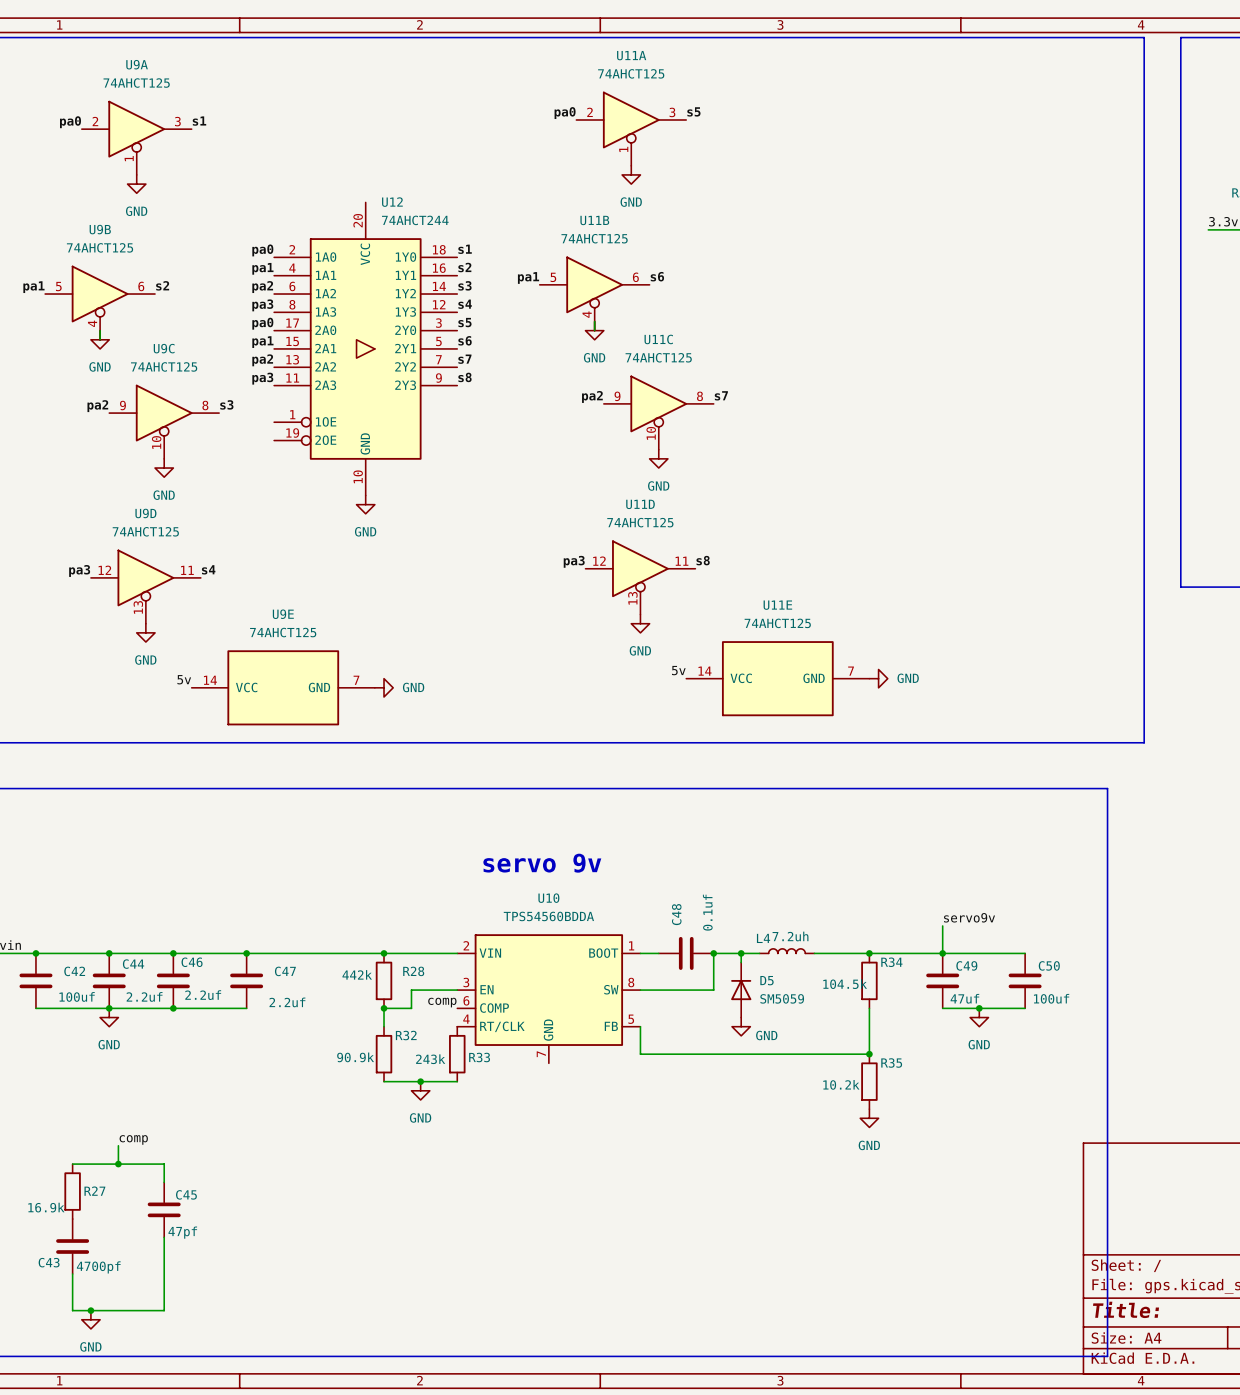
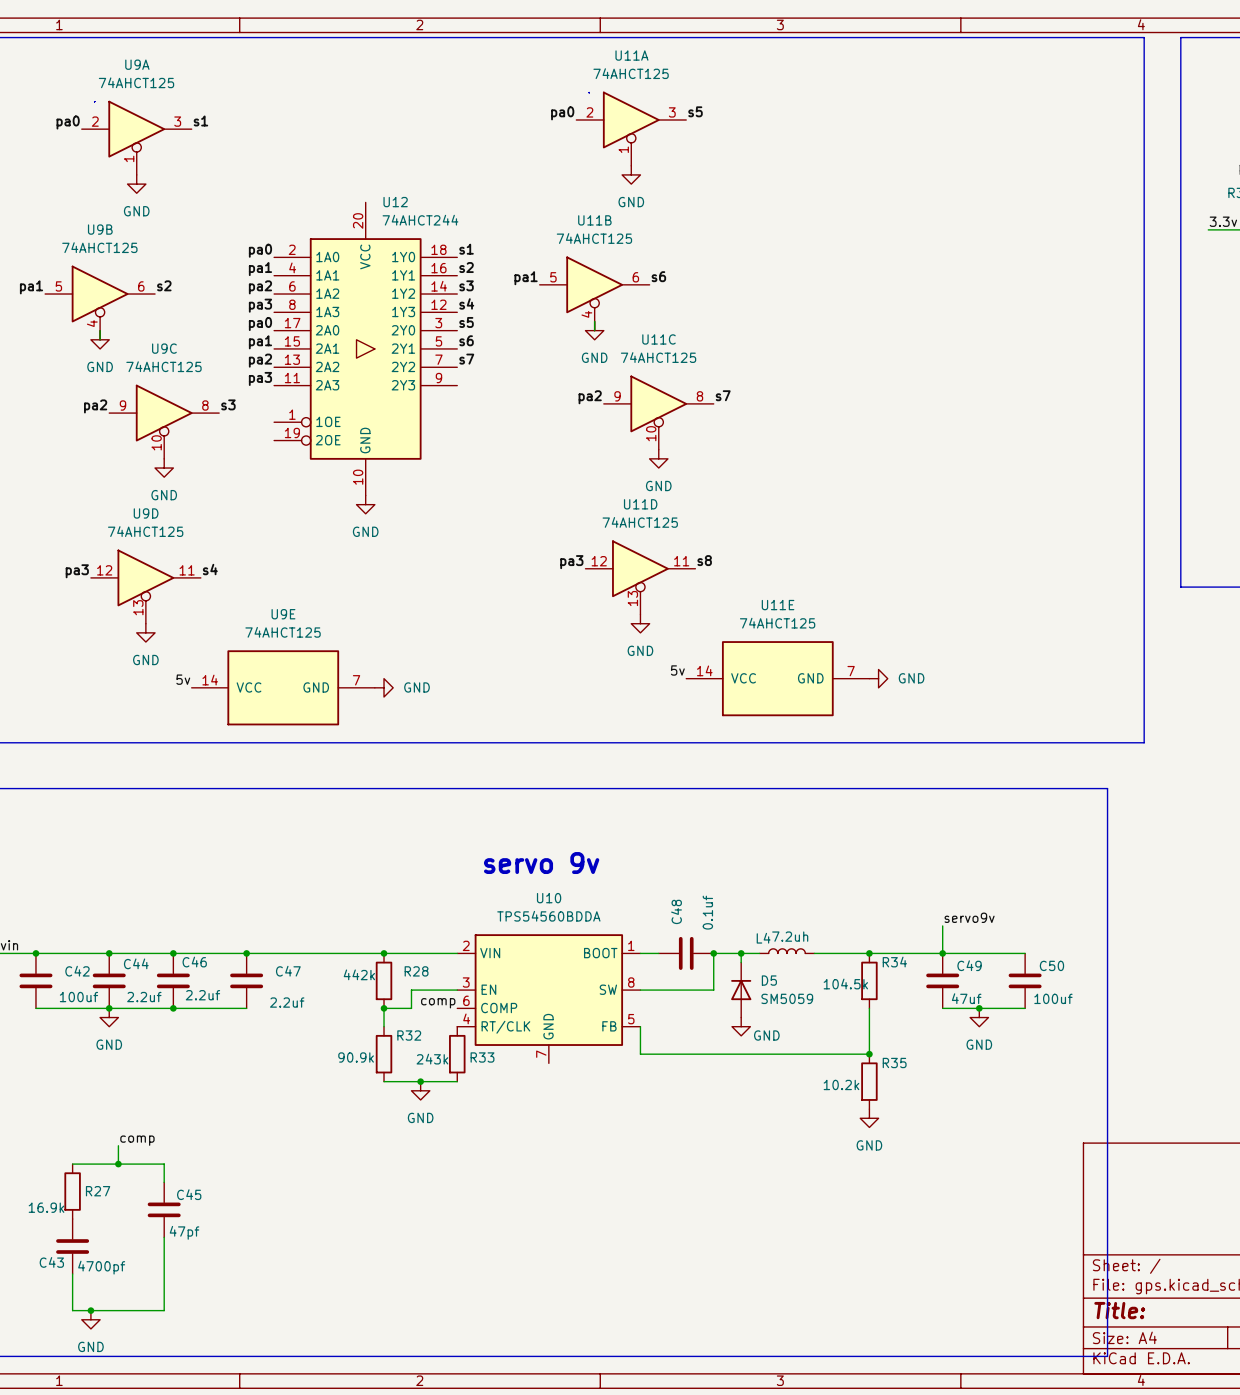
label: s8 (464, 377) -> none

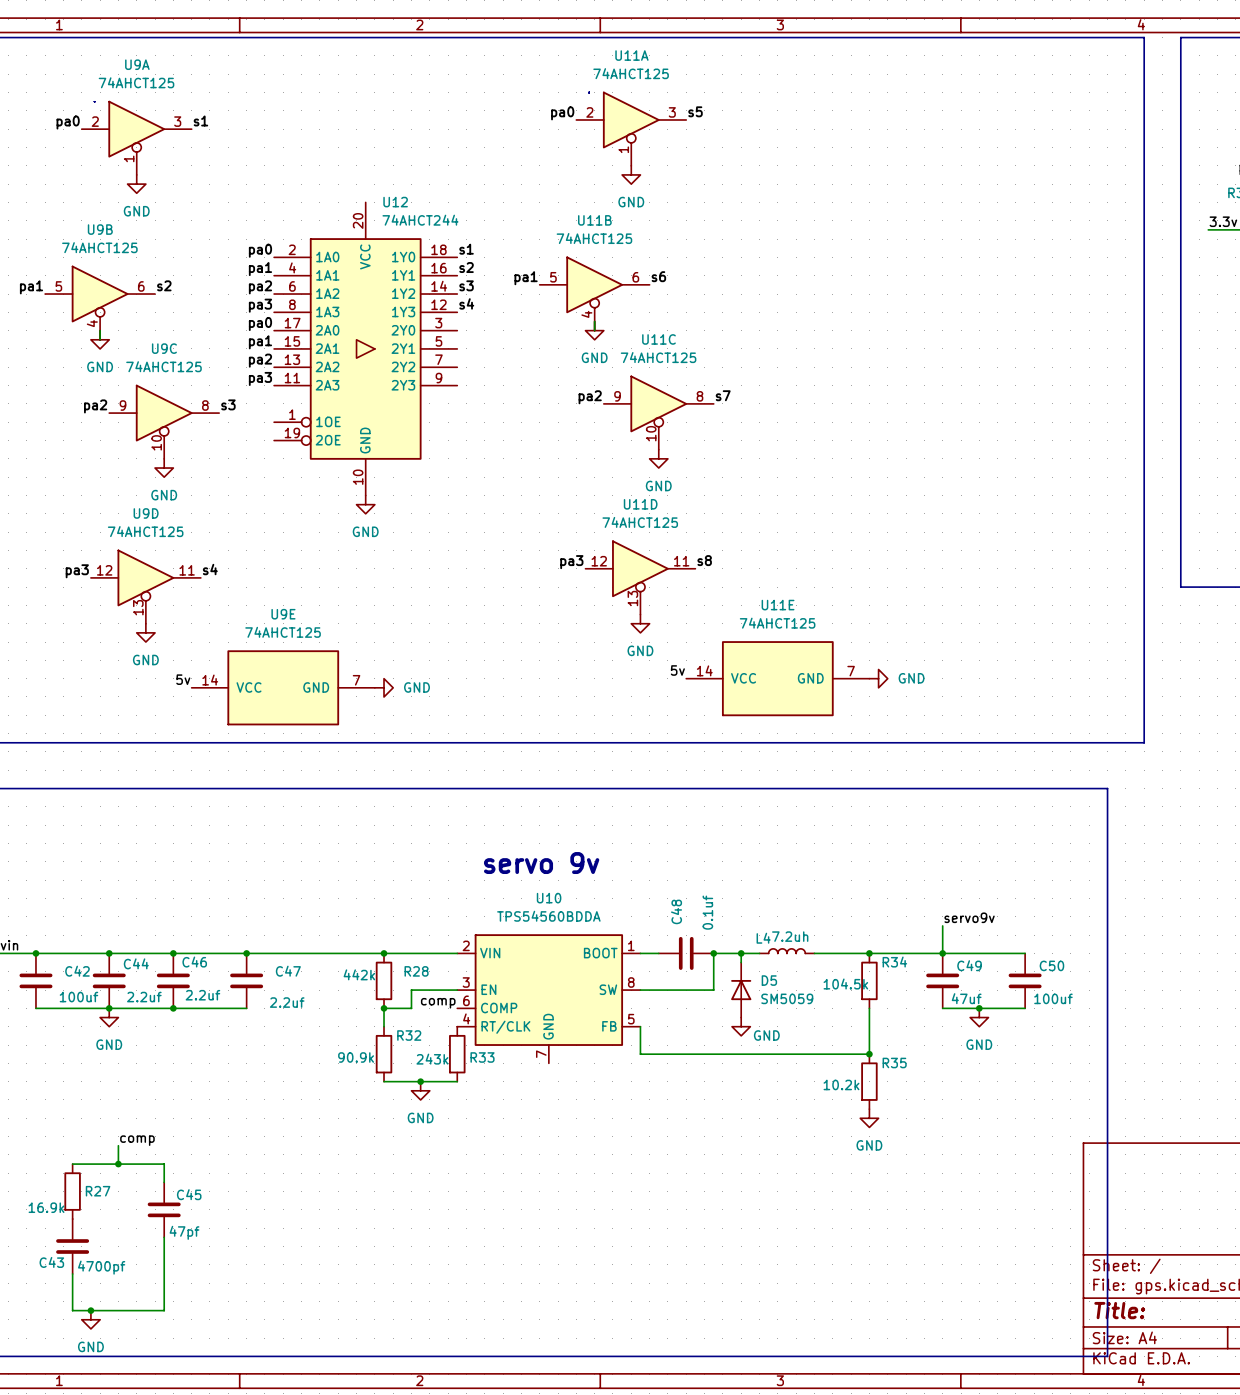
label: s5 (466, 322) -> none
label: s6 (466, 340) -> none
label: s7 (466, 359) -> none

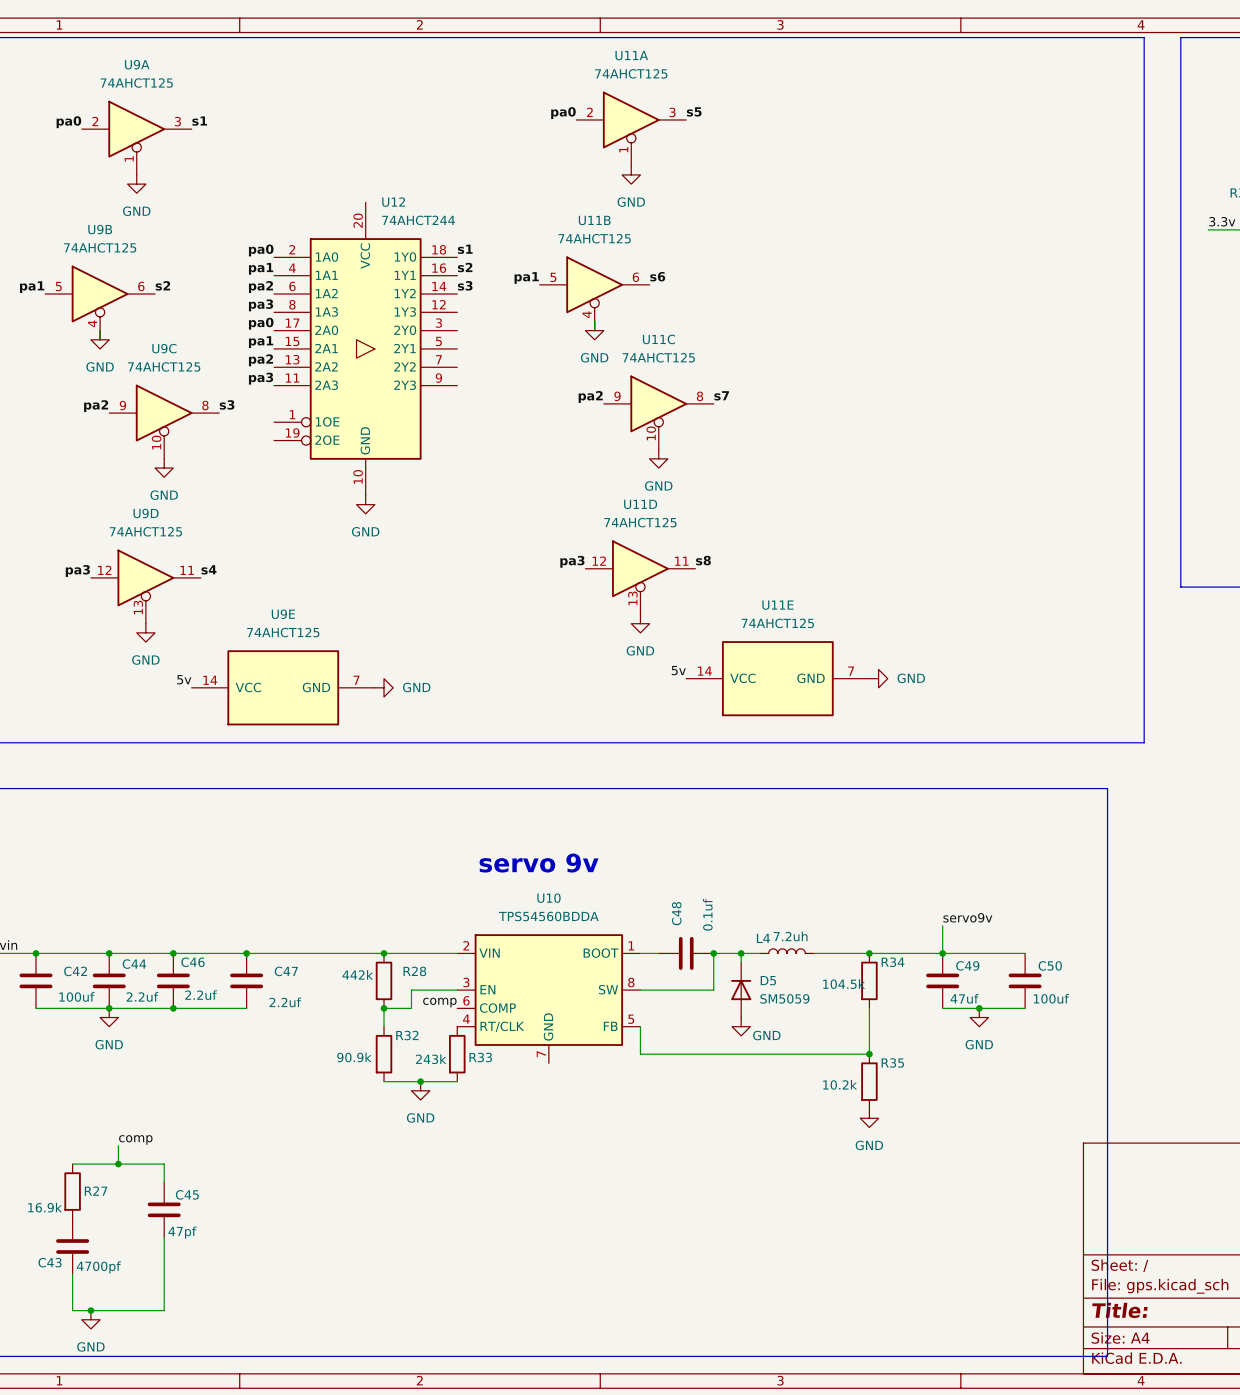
label: s4 (466, 303) -> none

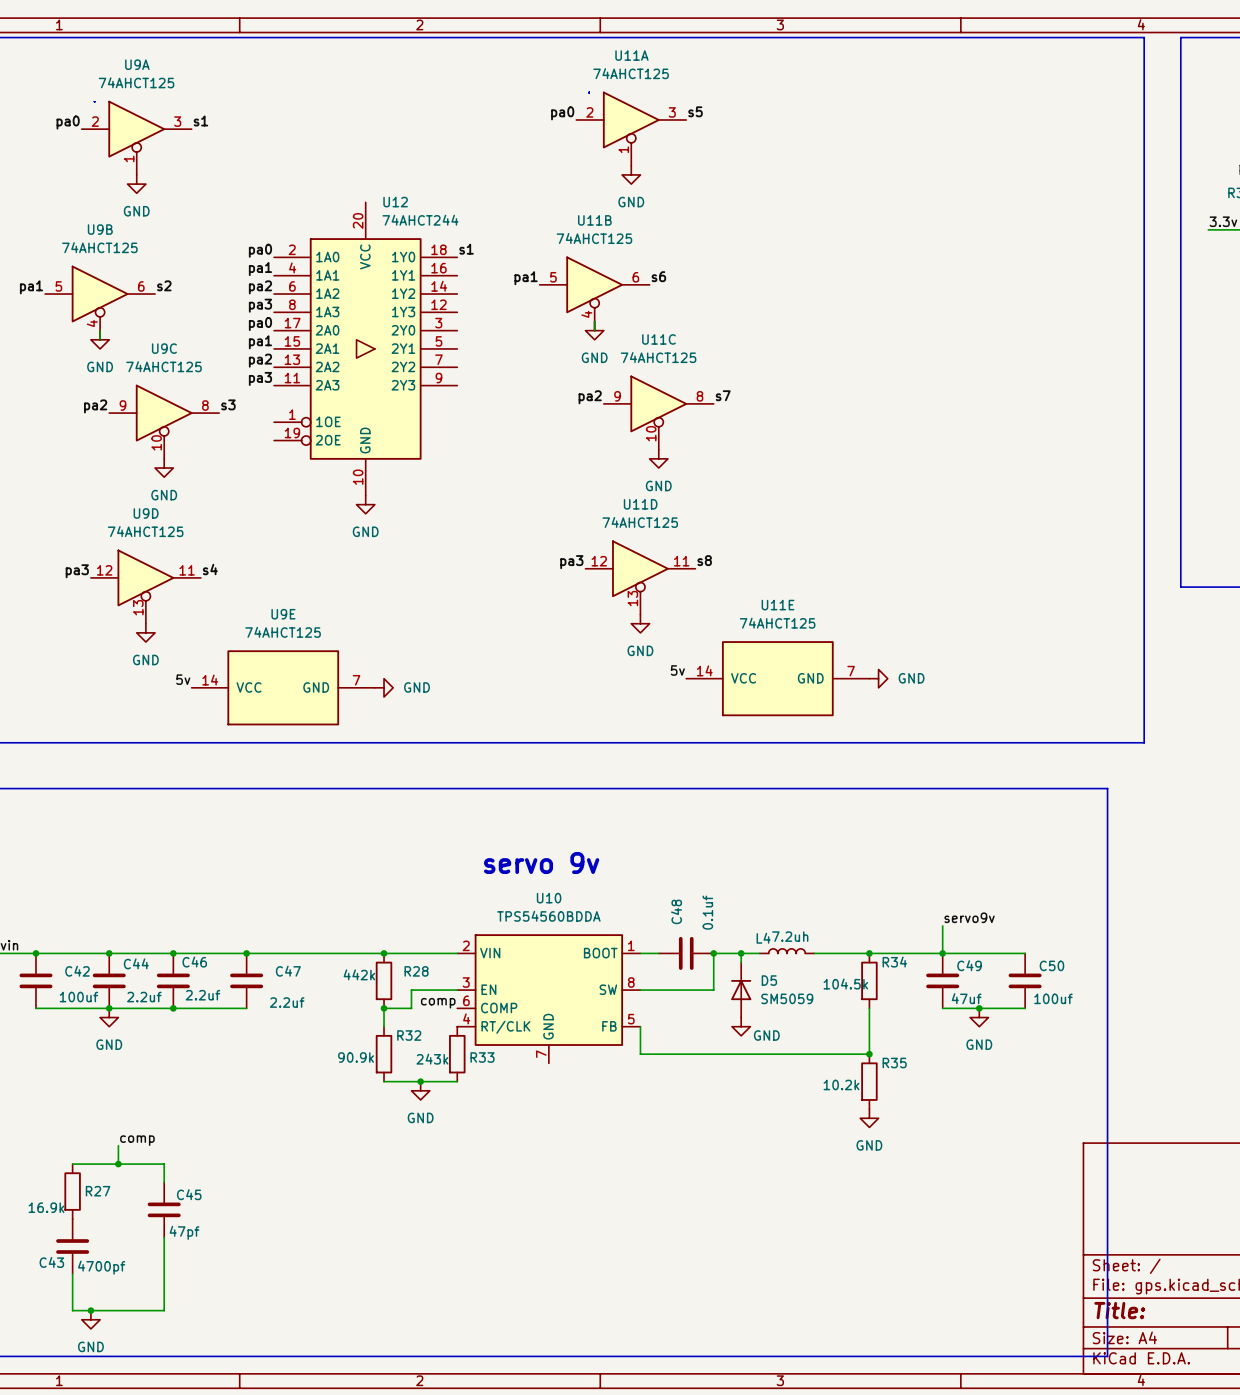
label: s2 (465, 267) -> none
label: s3 (465, 285) -> none

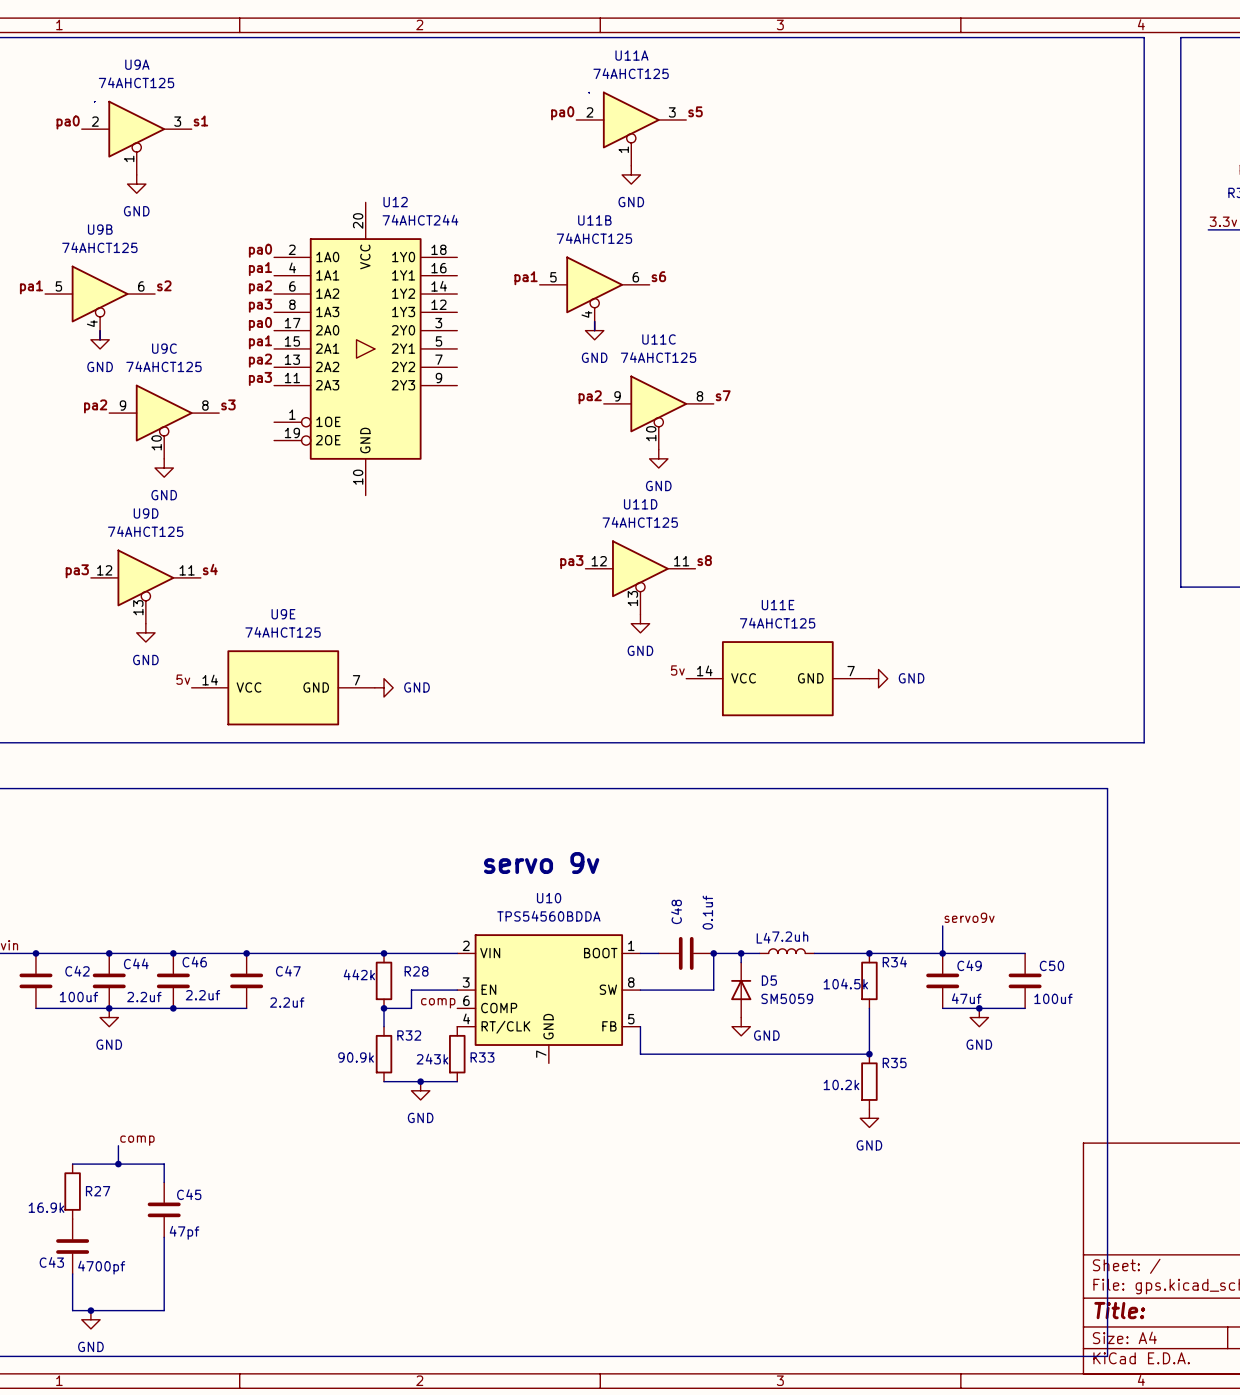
label: s1 (466, 249) -> none
power symbol: GND (365, 504) -> none

